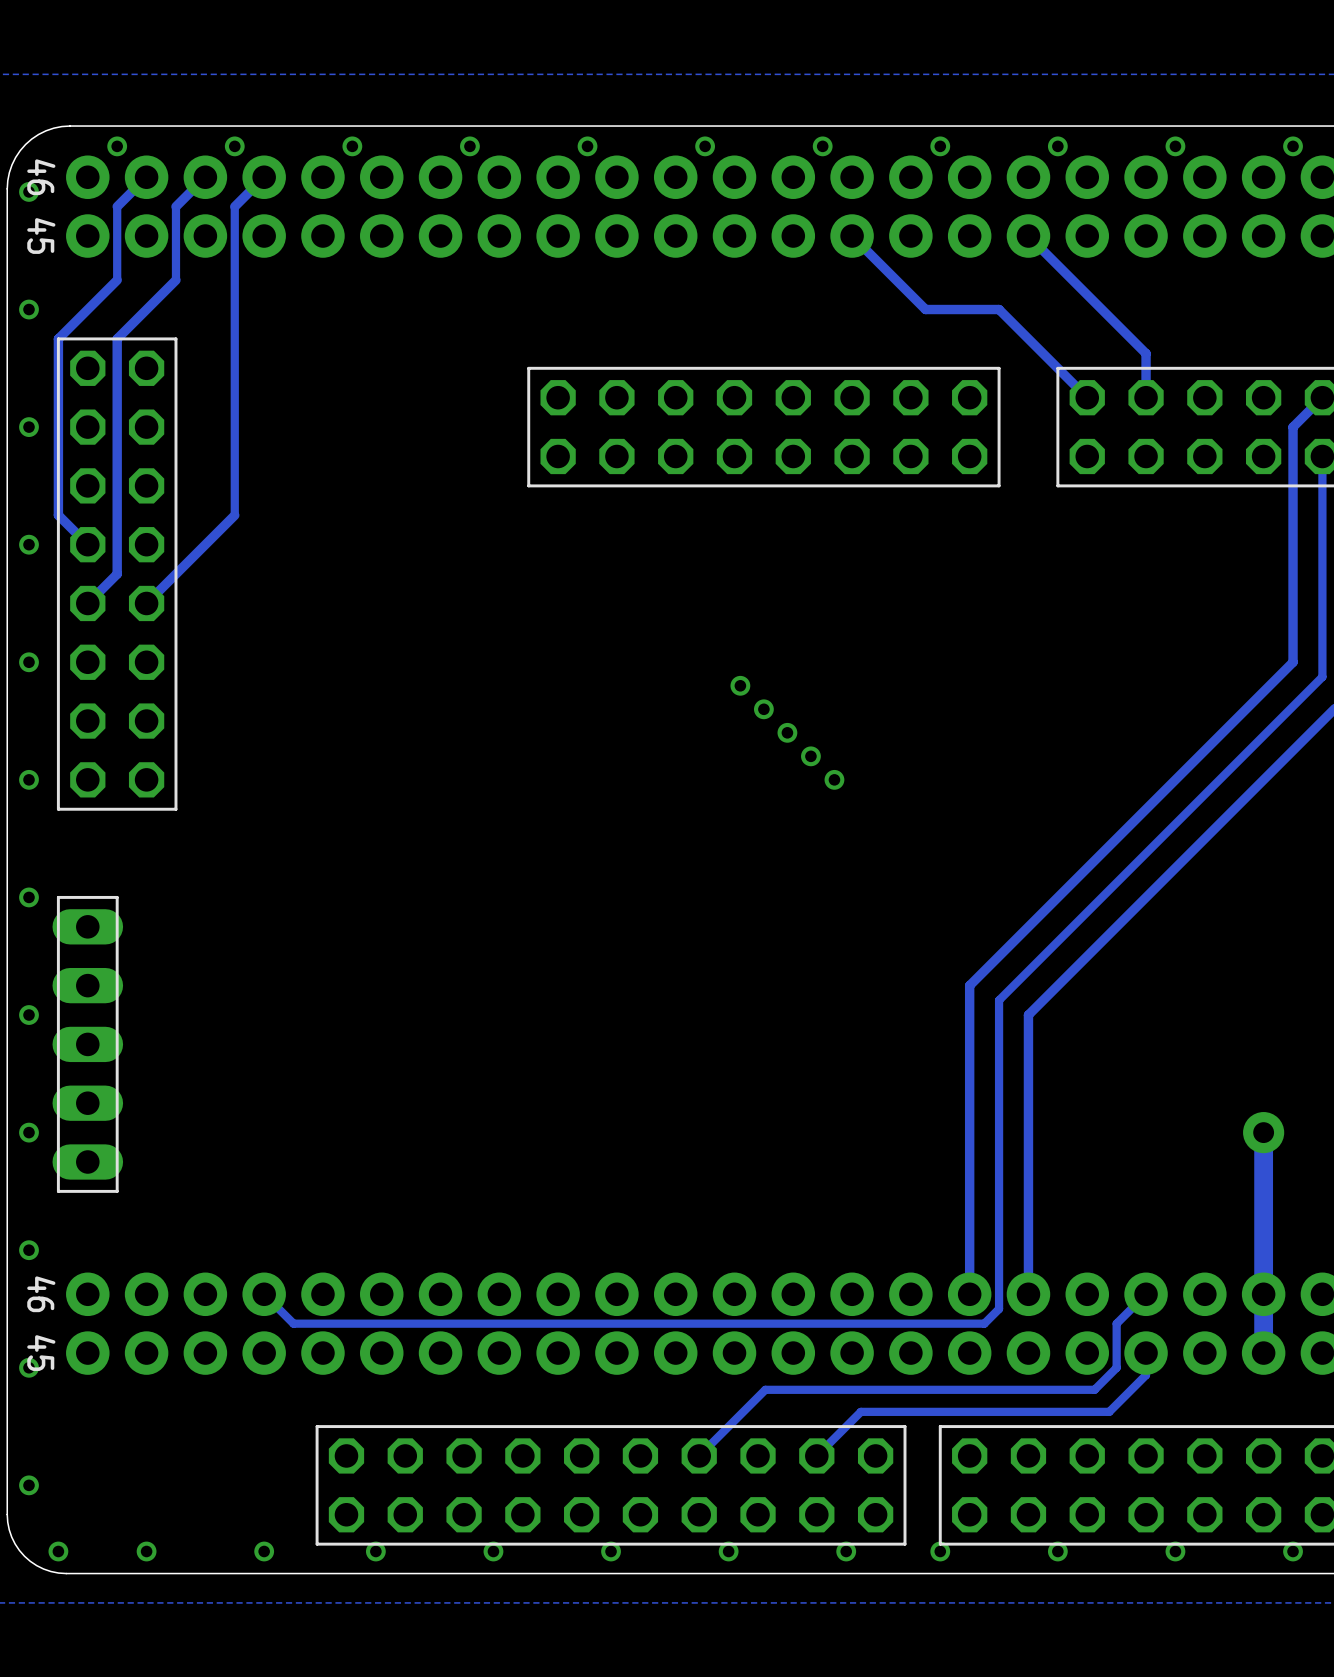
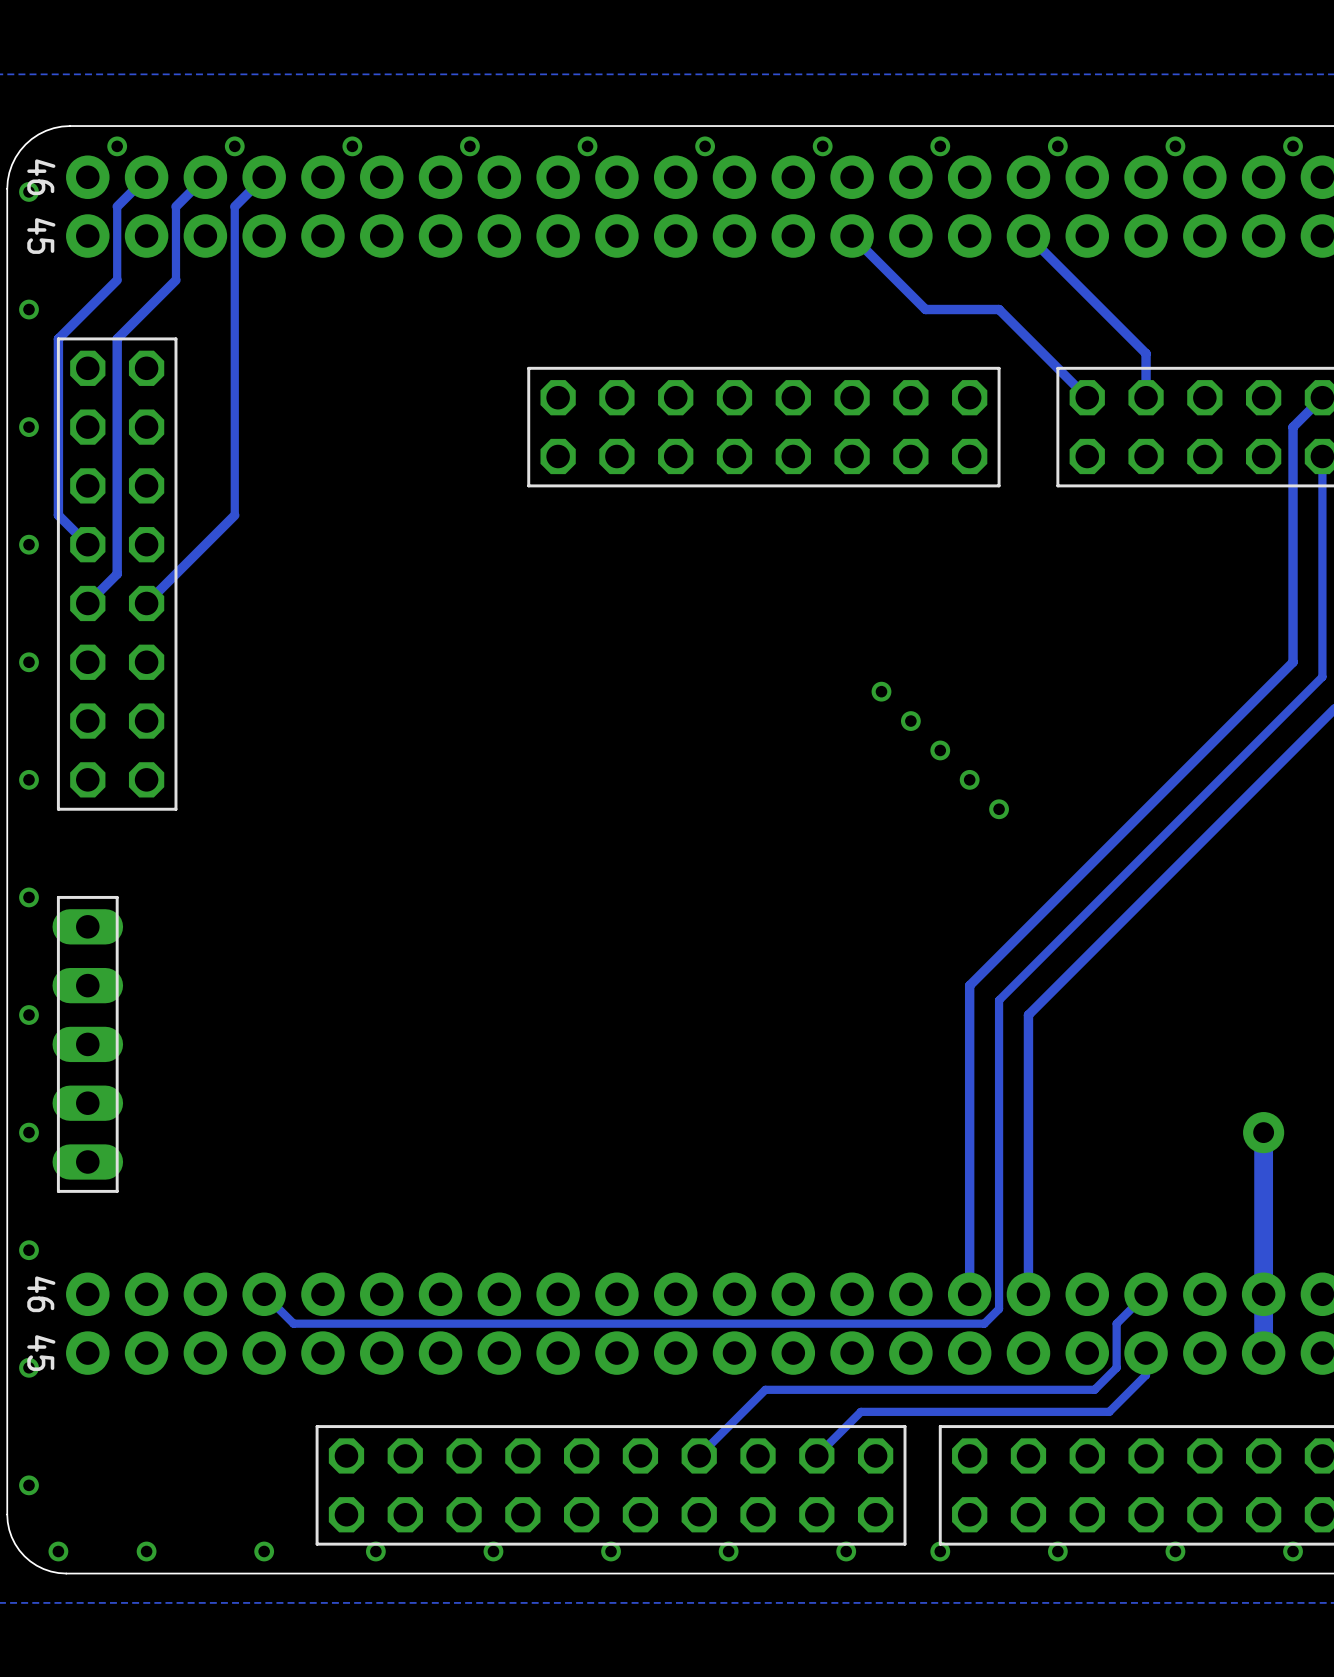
via: (740, 685) -> none
via: none -> (881, 691)
via: (763, 709) -> none
via: none -> (910, 721)
via: (787, 732) -> none
via: none -> (940, 750)
via: (810, 756) -> none
via: (834, 779) -> none
via: none -> (969, 779)
via: none -> (999, 809)

